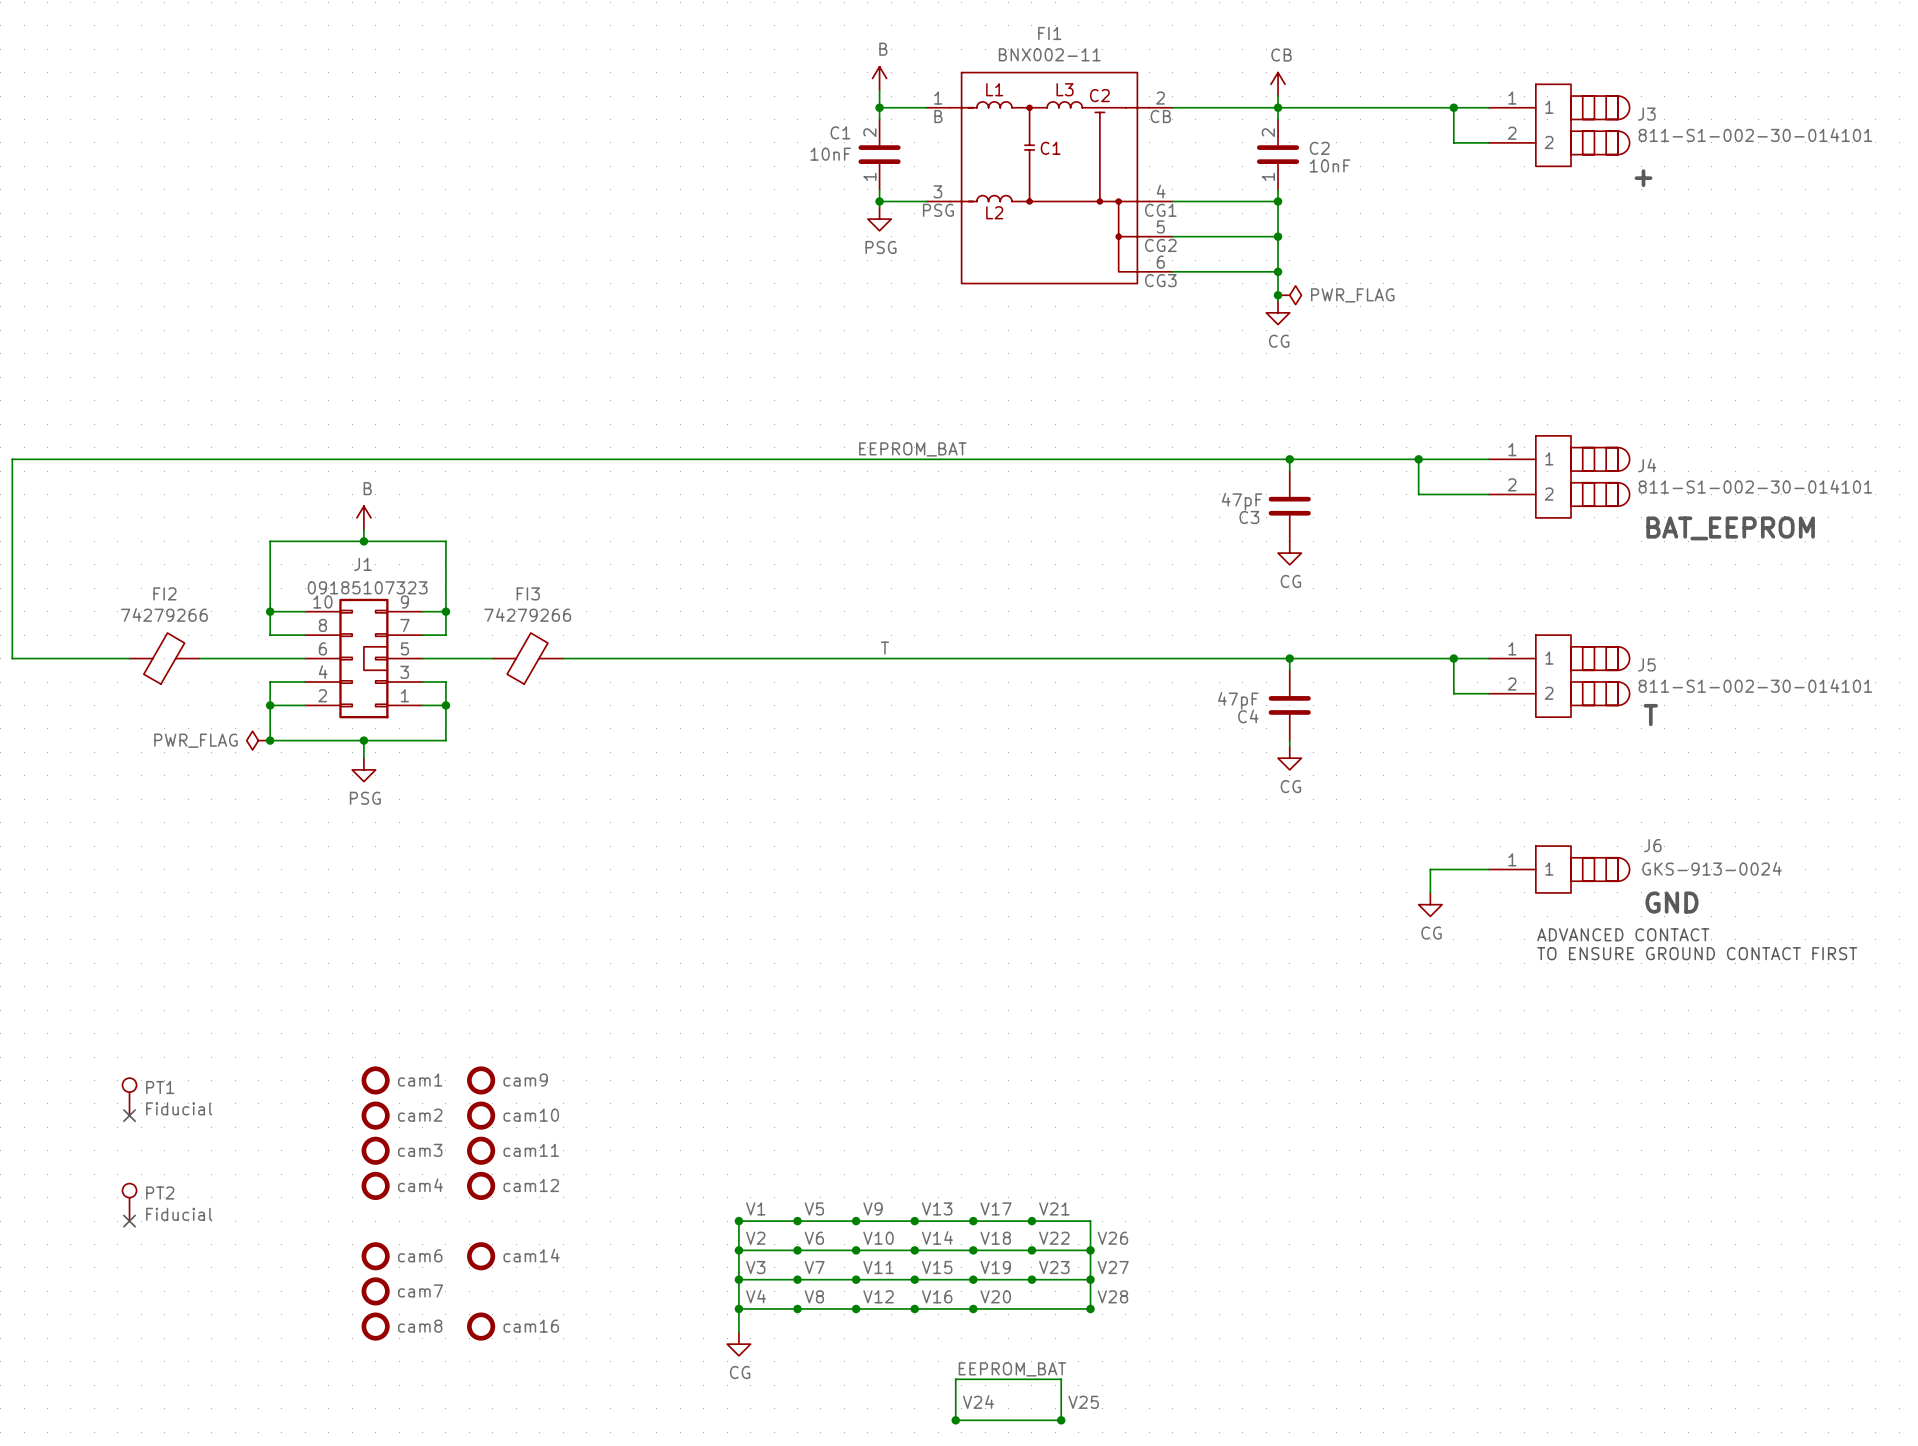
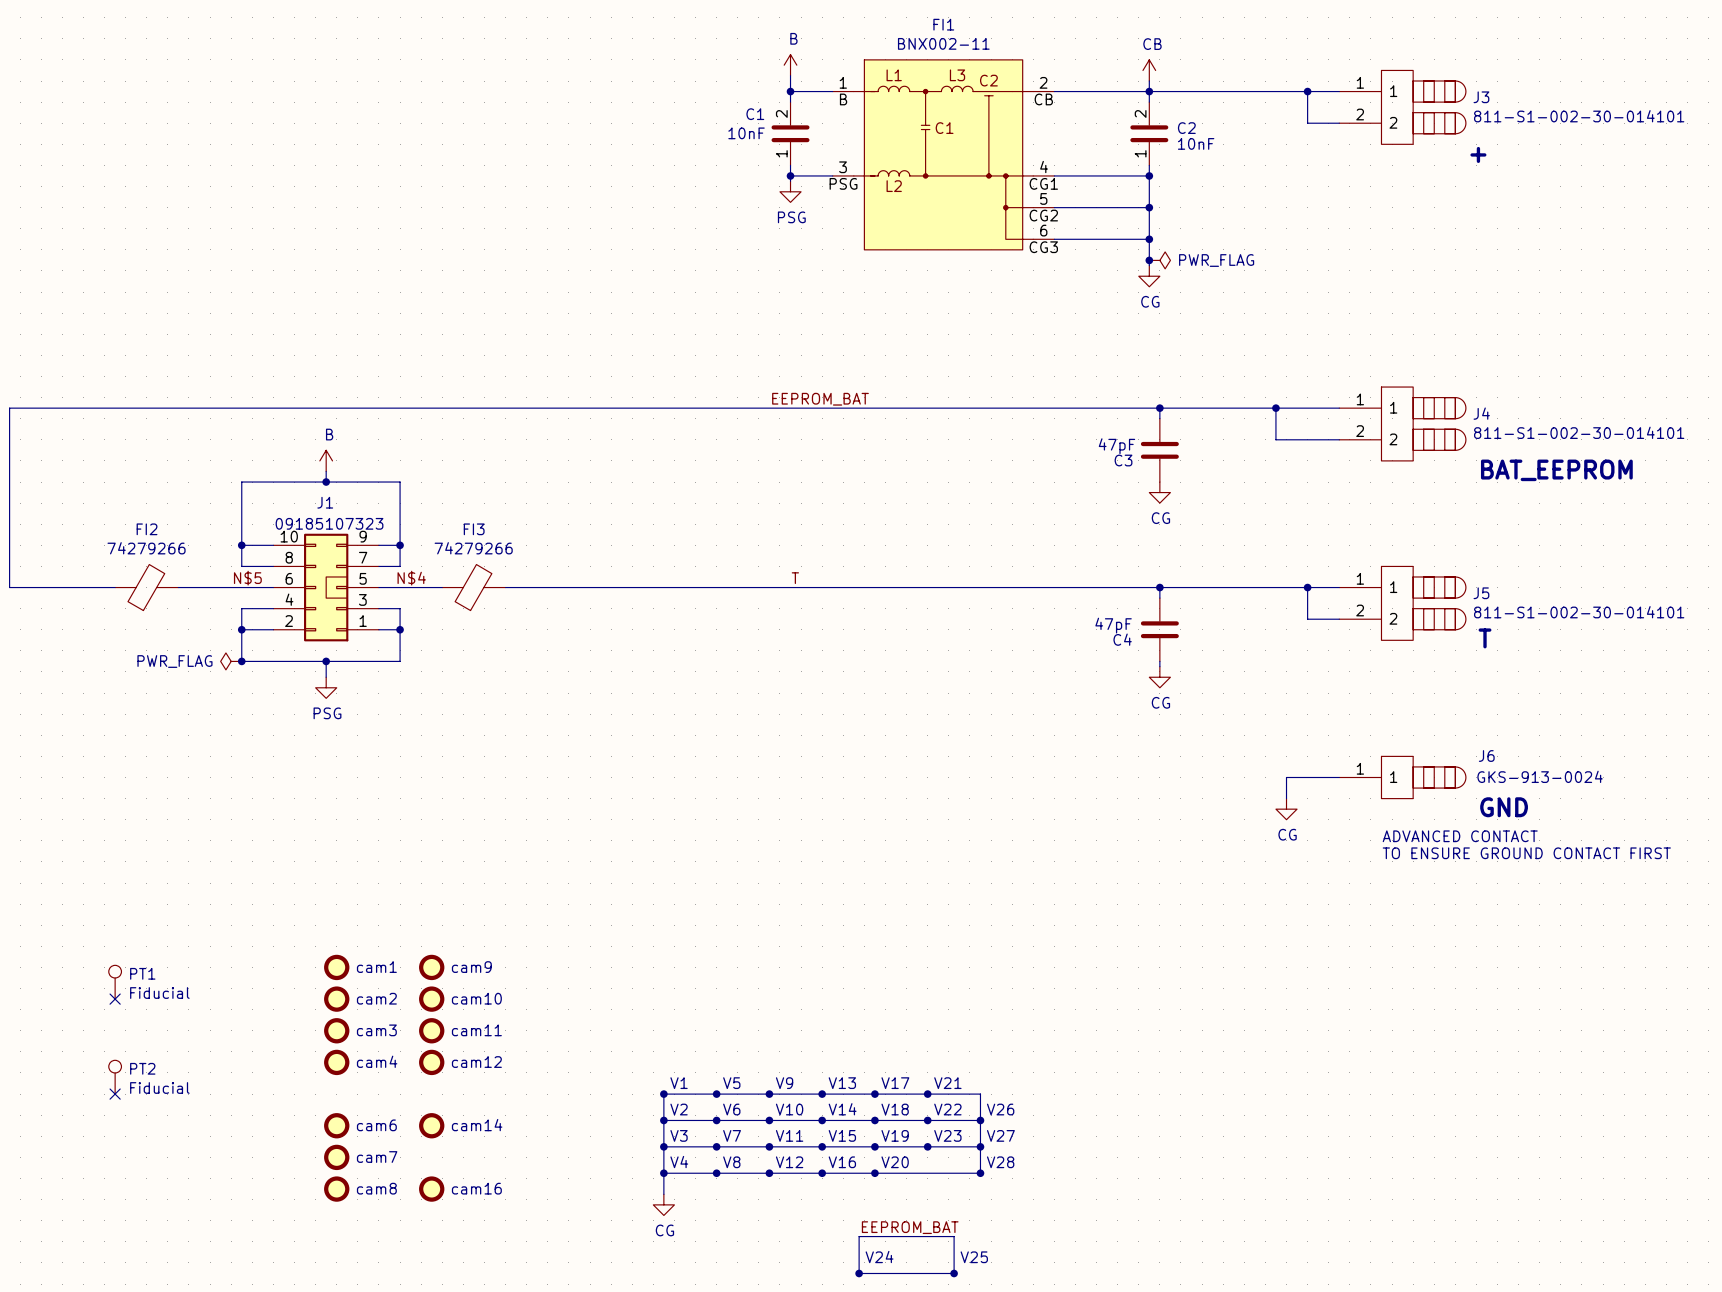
label: none -> N$5 (247, 578)
label: none -> N$4 (411, 578)

